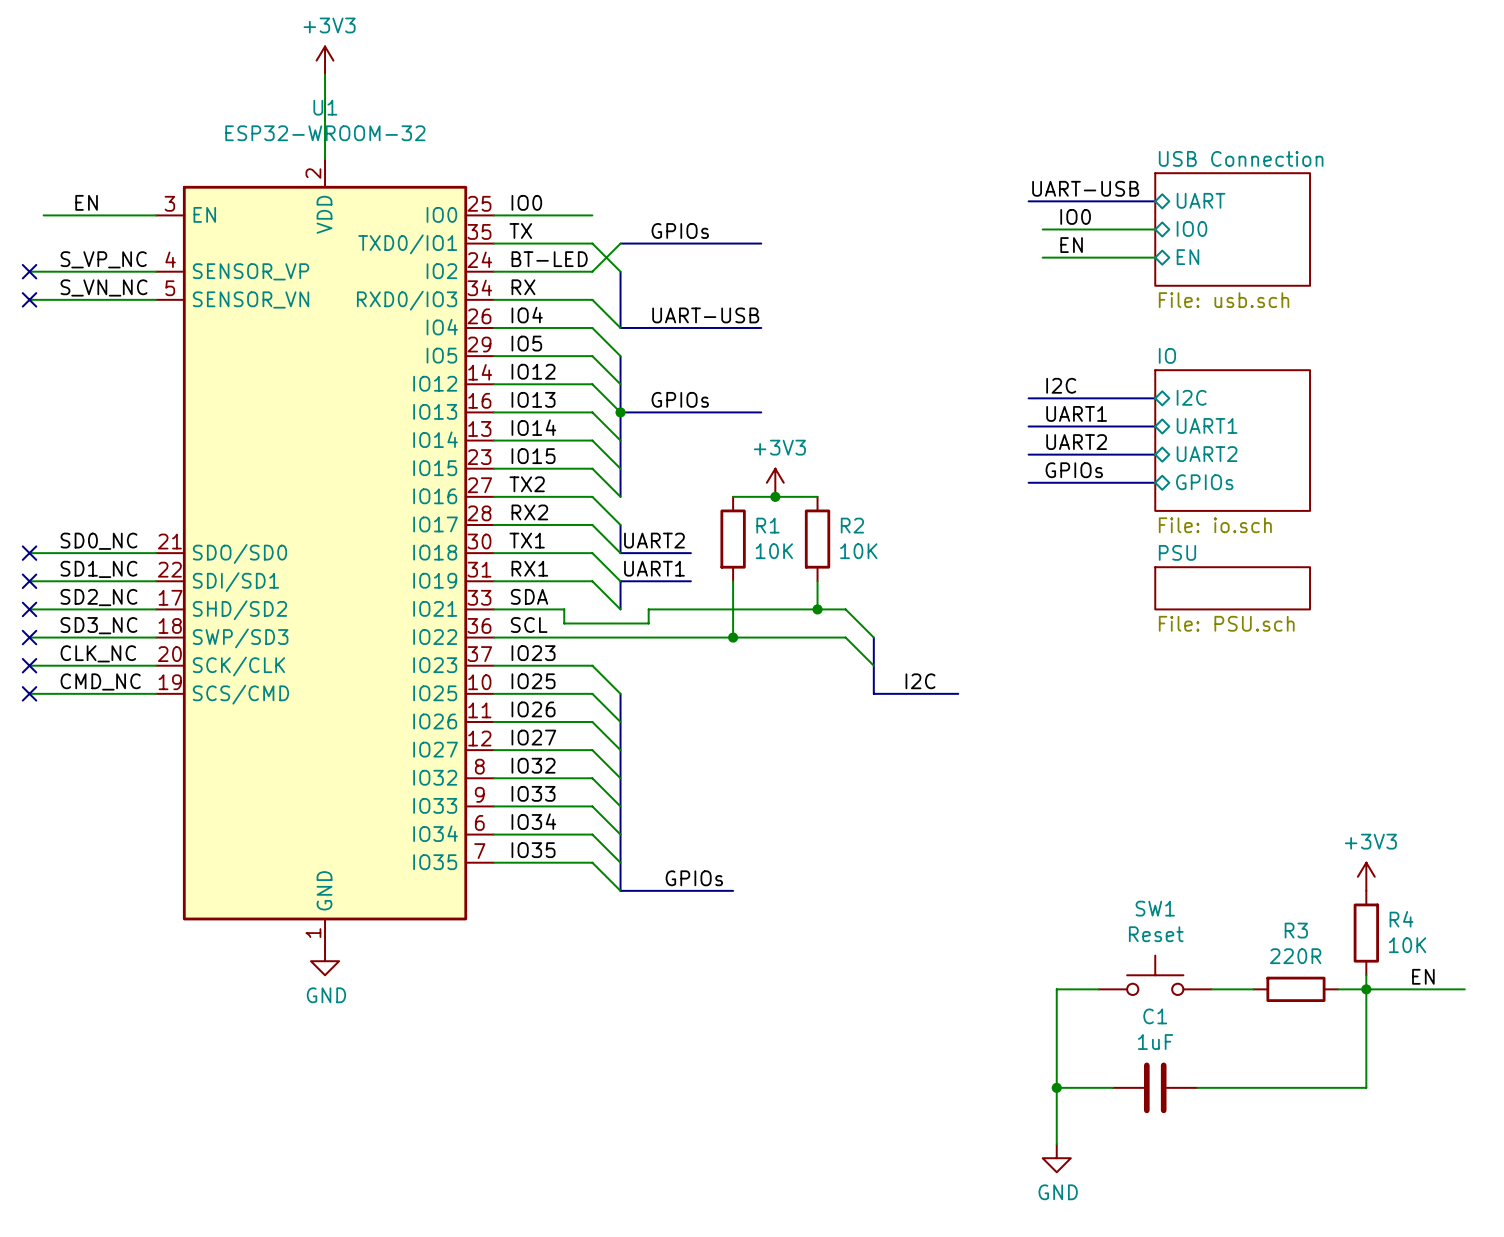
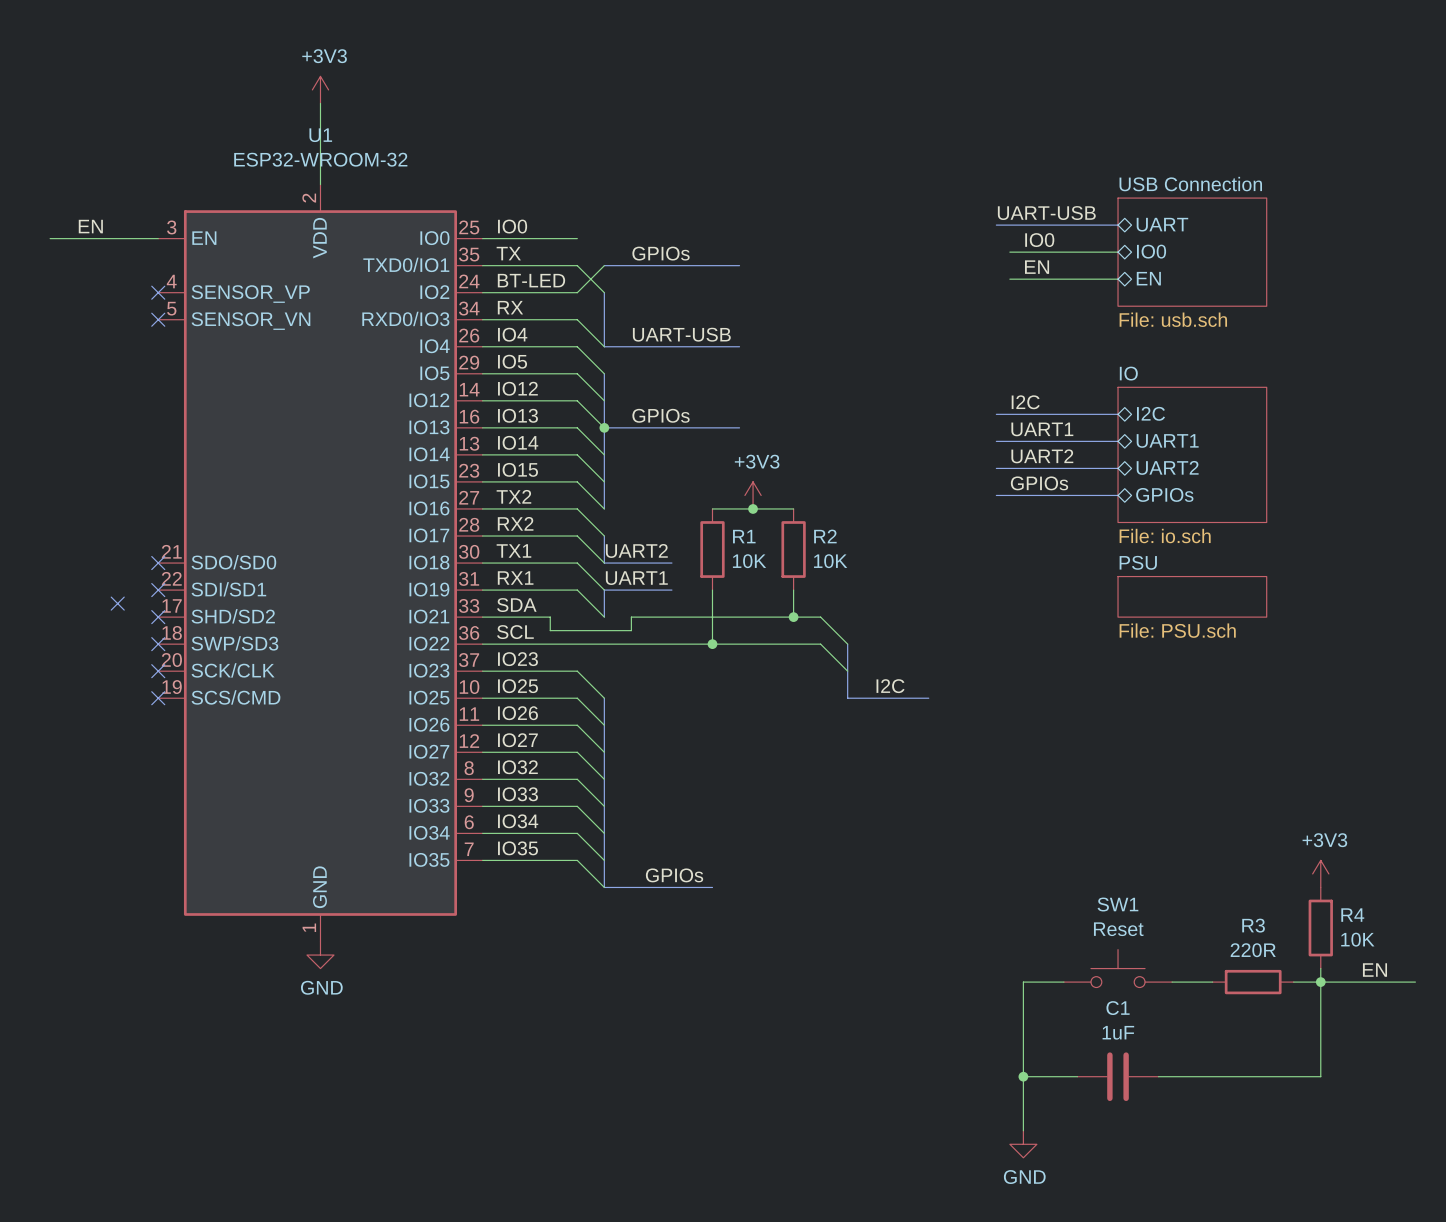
label: S_VP_NC (103, 259) -> none
wire: (29, 271) (156, 271) -> none
no-connect mark: (29, 271) -> none
no-connect mark: none -> (158, 292)
label: S_VN_NC (104, 287) -> none
wire: (29, 299) (156, 299) -> none
no-connect mark: (29, 299) -> none
no-connect mark: none -> (158, 319)
label: SD0_NC (98, 541) -> none
wire: (29, 553) (156, 553) -> none
no-connect mark: (29, 553) -> none
no-connect mark: none -> (158, 563)
label: SD1_NC (98, 569) -> none
wire: (29, 581) (156, 581) -> none
no-connect mark: (29, 581) -> none
no-connect mark: none -> (158, 590)
no-connect mark: none -> (117, 603)
label: SD2_NC (98, 597) -> none
wire: (29, 609) (156, 609) -> none
no-connect mark: (29, 609) -> none
no-connect mark: none -> (158, 617)
label: SD3_NC (98, 625) -> none
wire: (29, 637) (156, 637) -> none
no-connect mark: (29, 637) -> none
no-connect mark: none -> (158, 644)
label: CLK_NC (98, 653) -> none
wire: (29, 665) (156, 665) -> none
no-connect mark: (29, 665) -> none
no-connect mark: none -> (158, 671)
label: CMD_NC (100, 681) -> none
wire: (29, 693) (156, 693) -> none
no-connect mark: (29, 693) -> none
no-connect mark: none -> (158, 698)

